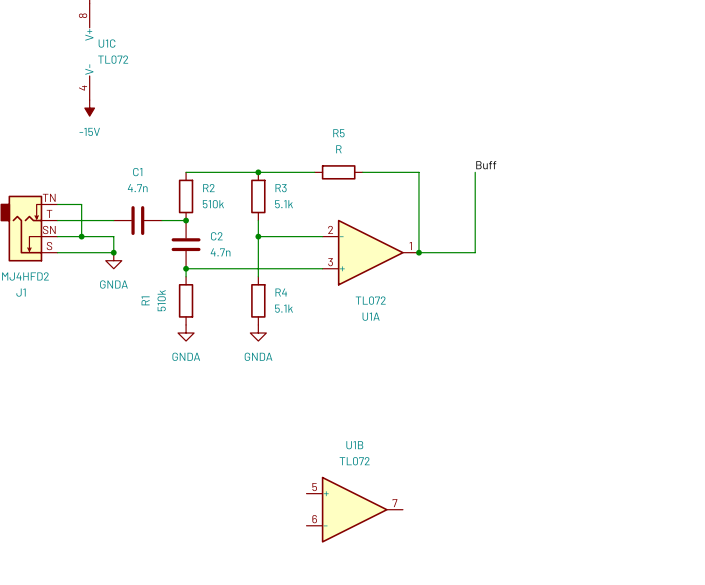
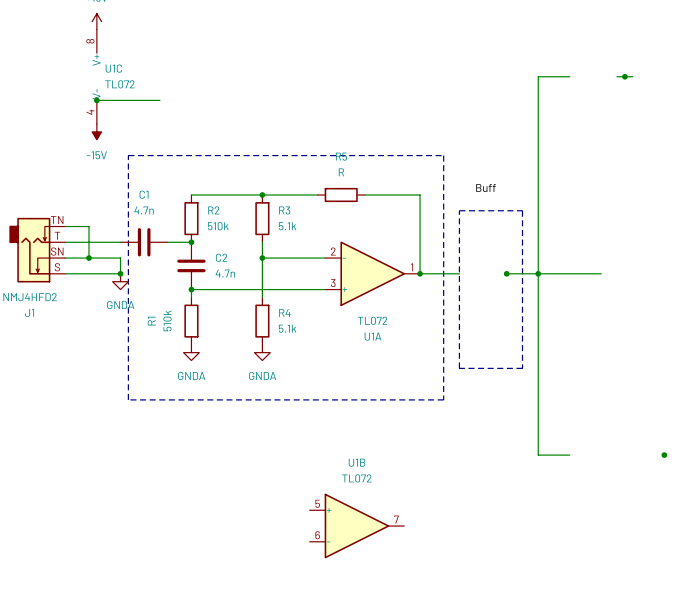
wire: none -> (569, 76) (538, 76) (538, 455) (569, 455)
wire: none -> (617, 76) (632, 76)
junction: none -> (624, 76)
wire: none -> (96, 100) (159, 100)
junction: none -> (96, 100)
line: none -> (128, 155) (443, 155) (443, 399) (128, 399) (128, 155)
wire: (475, 172) (475, 252) (459, 252) -> none
line: none -> (459, 210) (522, 210) (522, 368) (459, 368) (459, 210)
wire: none -> (506, 273) (601, 273)
junction: none -> (506, 273)
junction: none -> (538, 273)
junction: none -> (664, 455)

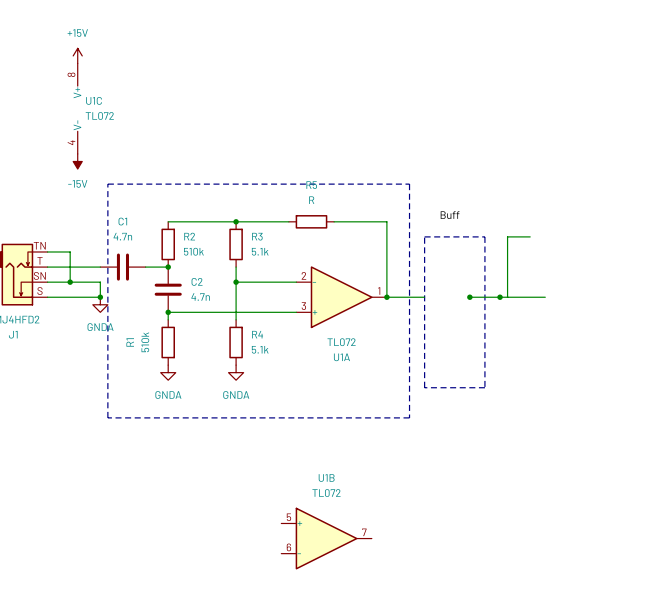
wire: (569, 76) (538, 76) (538, 455) (569, 455) -> none
wire: (617, 76) (632, 76) -> none
junction: (624, 76) -> none
wire: (96, 100) (159, 100) -> none
junction: (96, 100) -> none
wire: none -> (530, 236) (507, 236) (507, 297)
wire: (585, 273) (601, 273) -> none
junction: (664, 455) -> none

